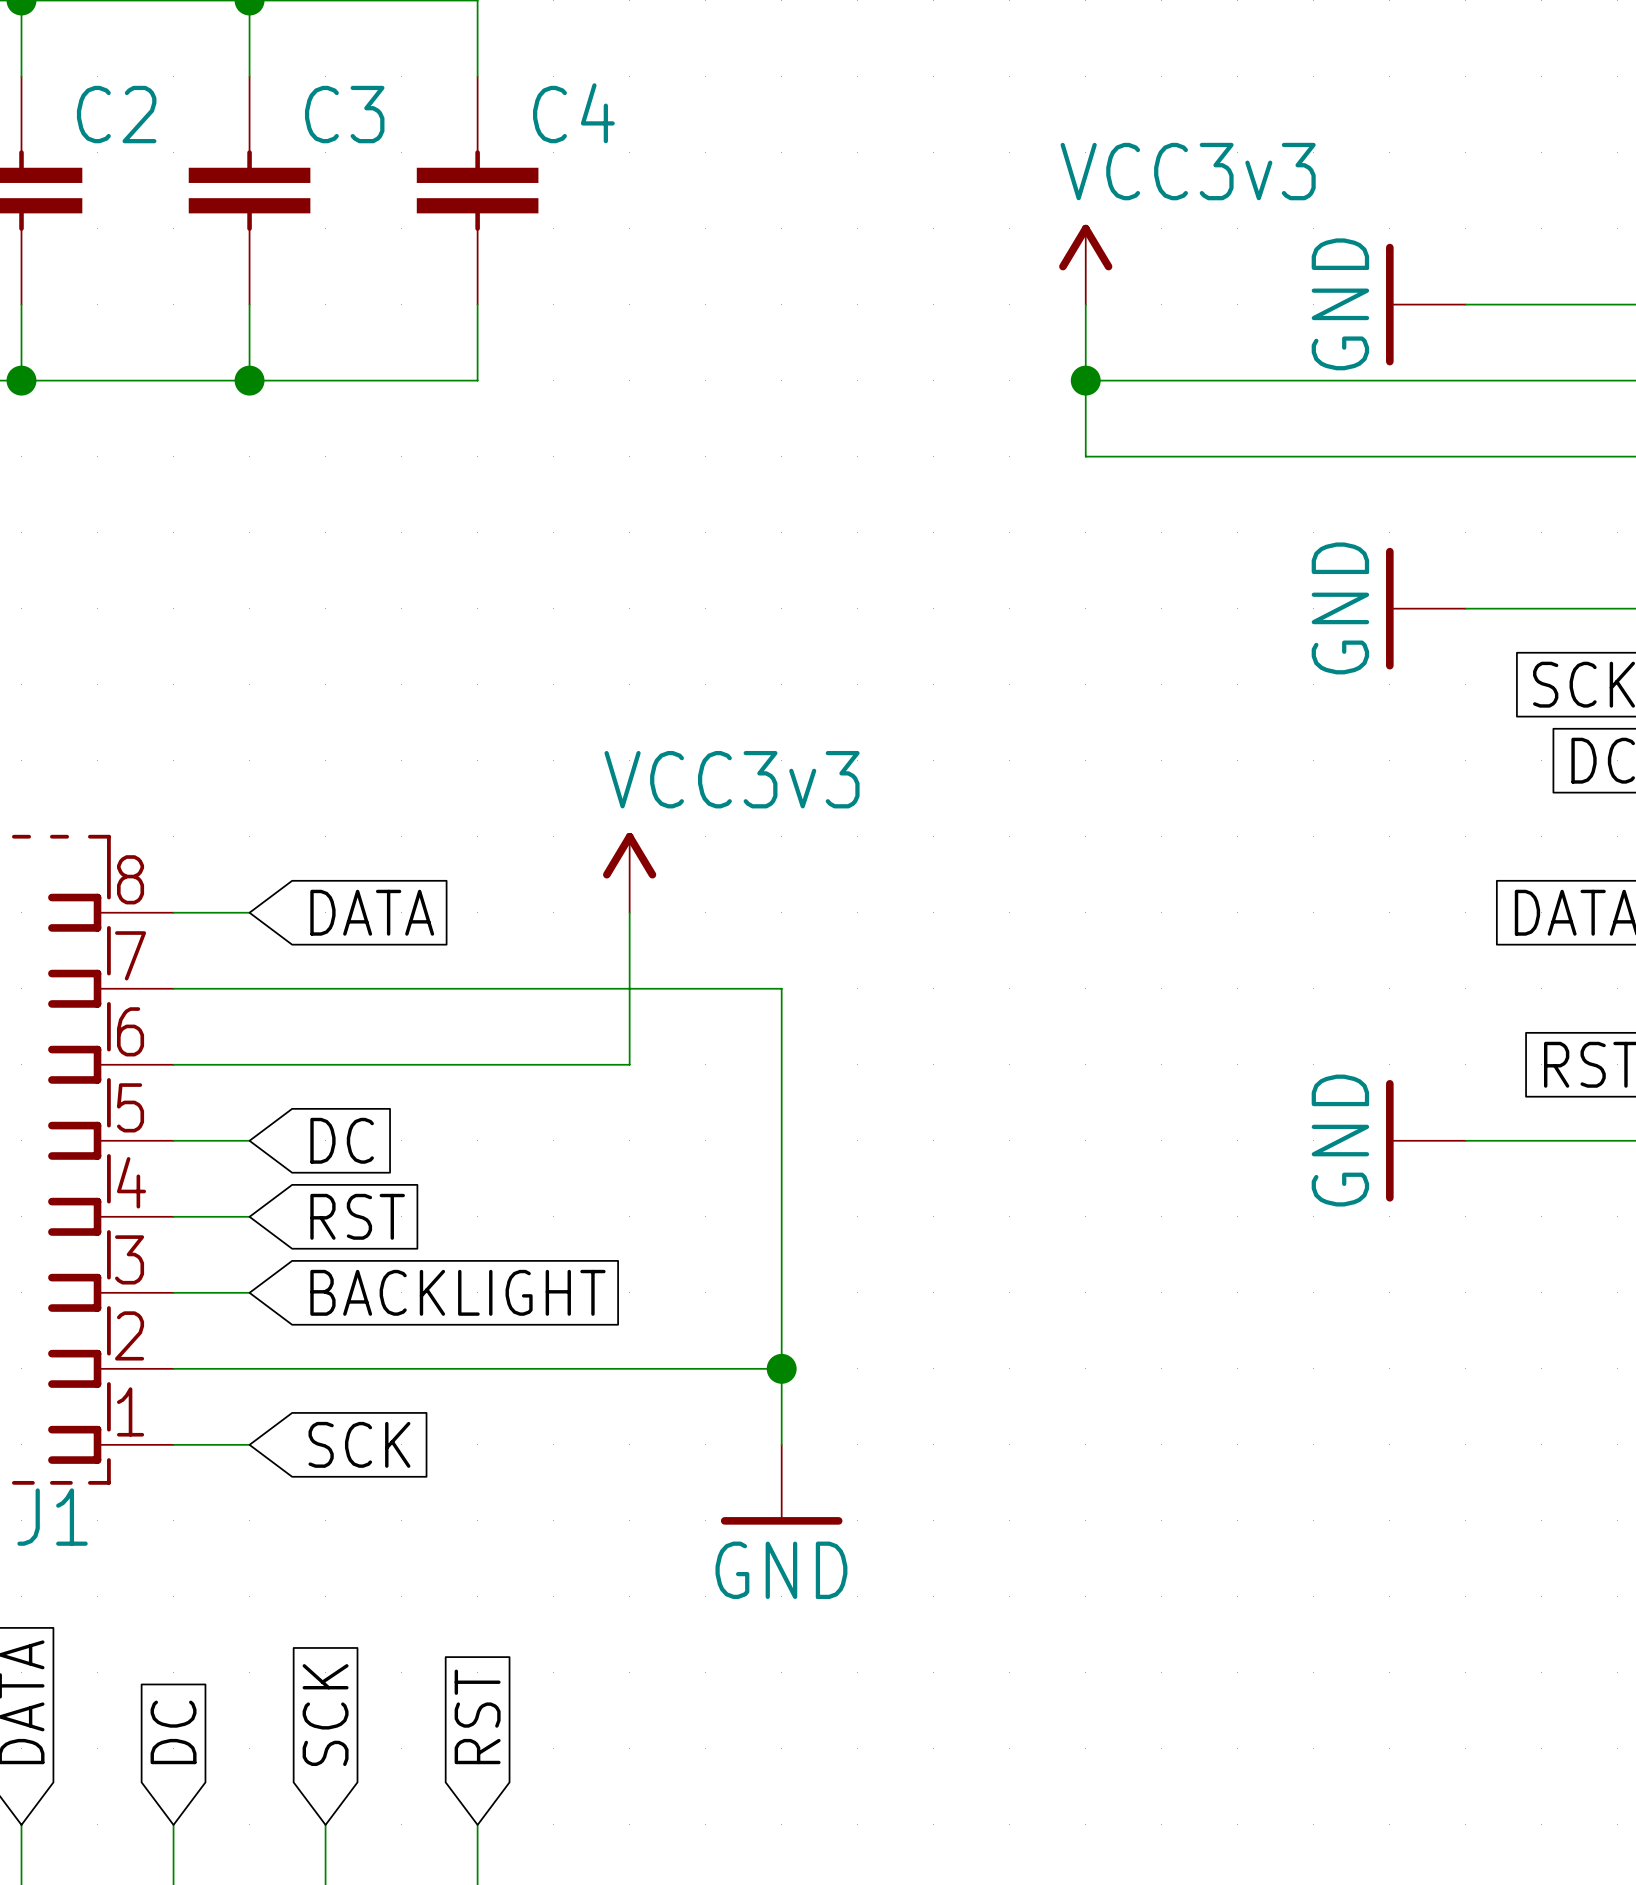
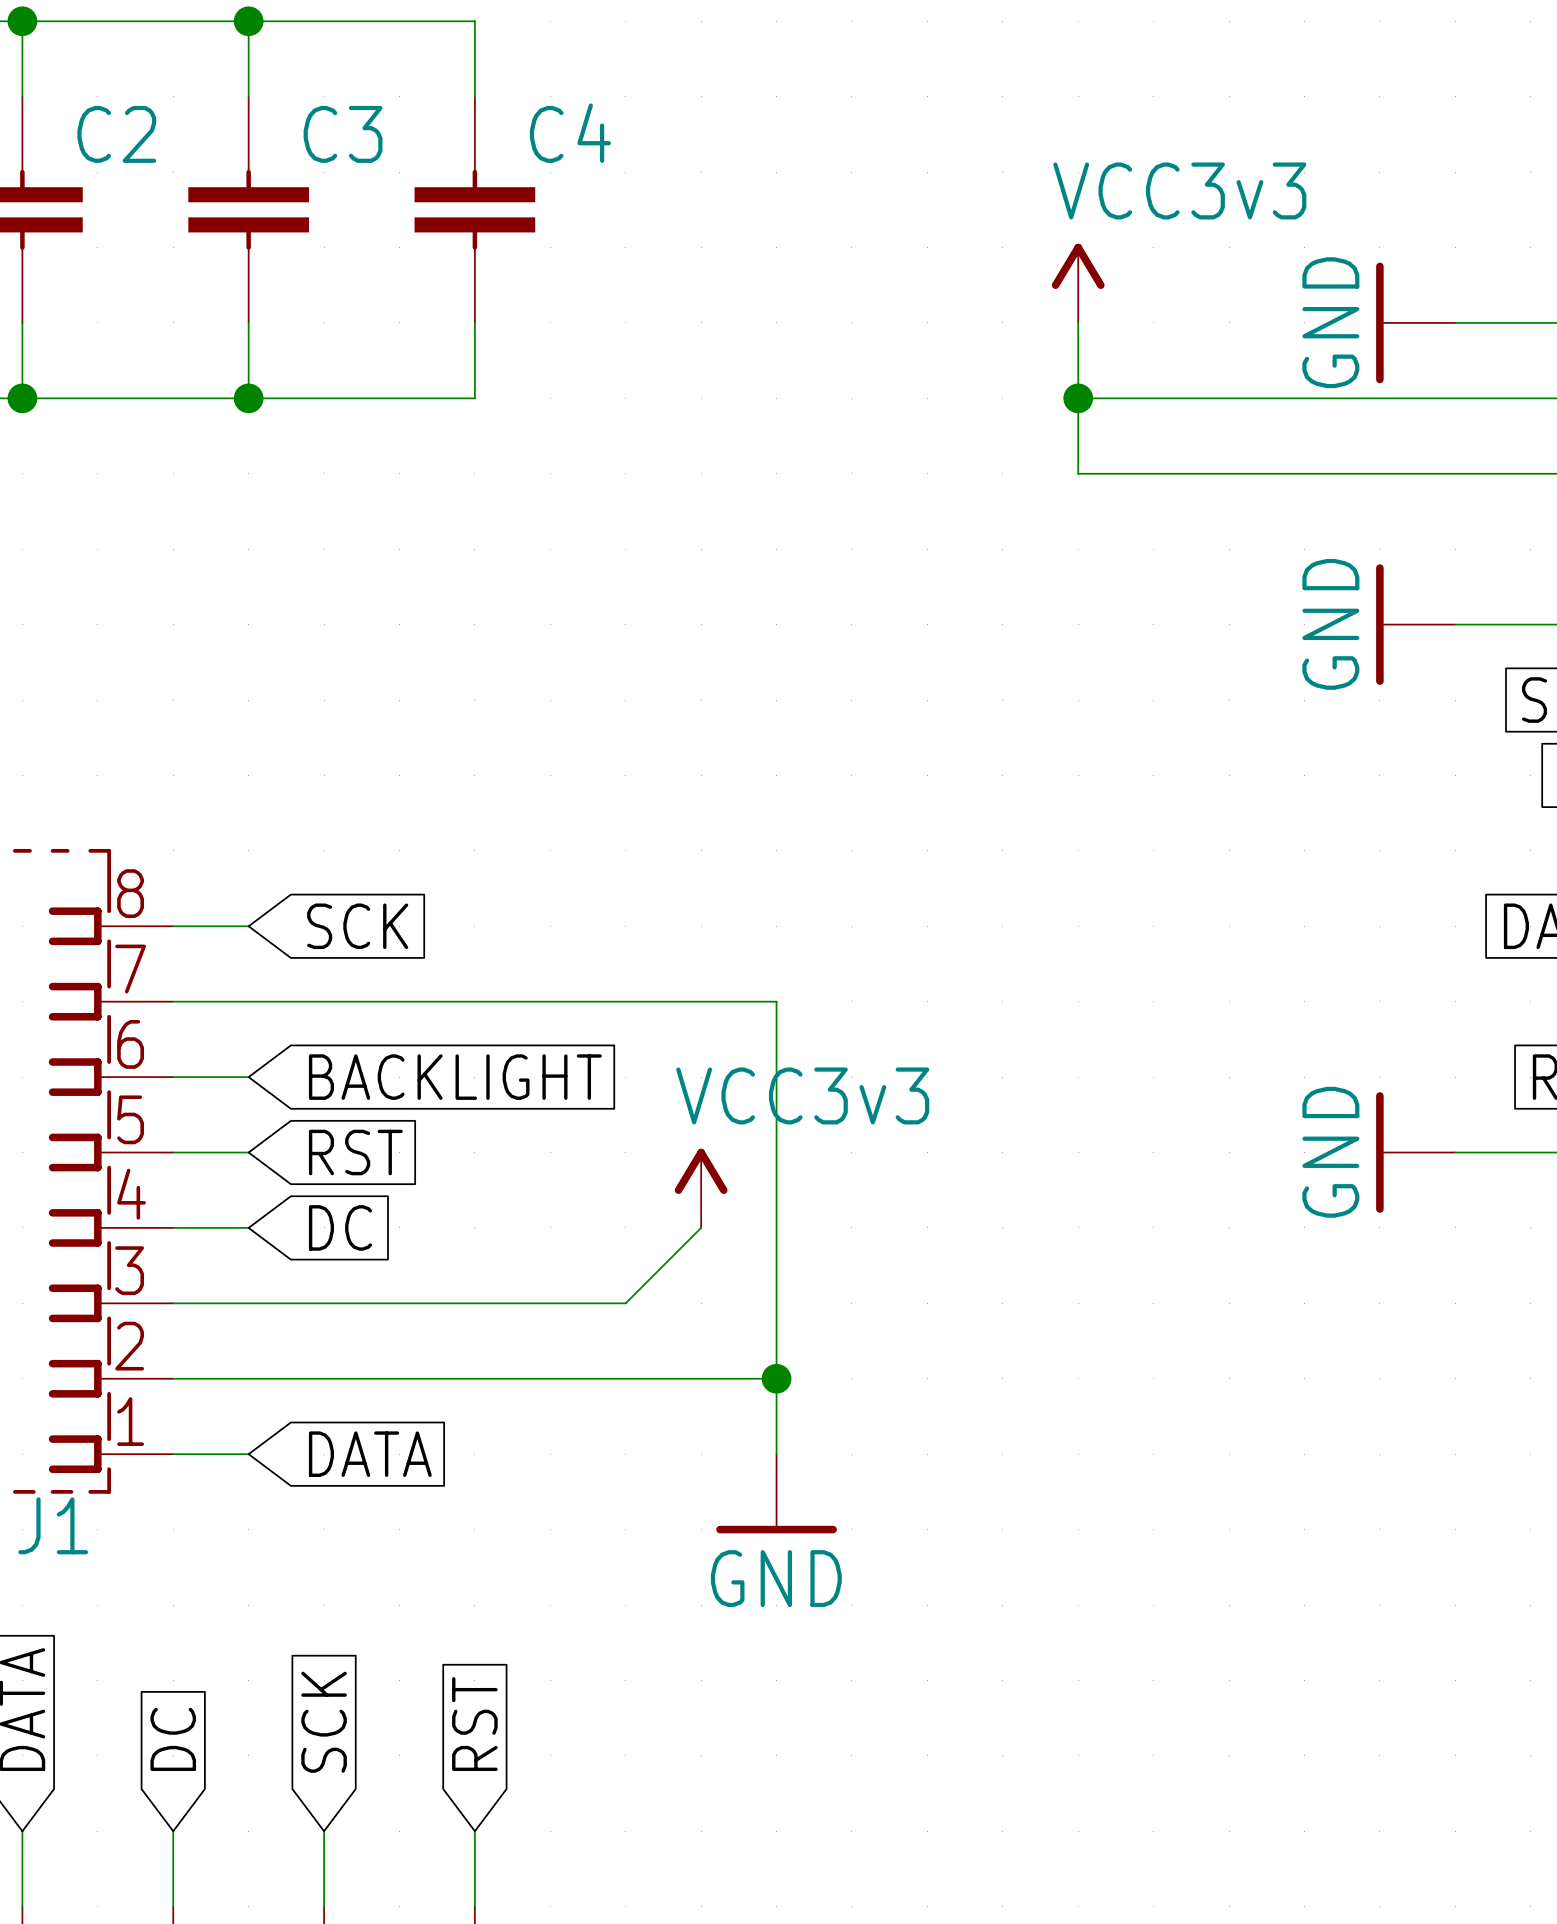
power symbol position: VCC3v3 (629, 872) -> VCC3v3 (701, 1188)
global label: DATA (372, 912) -> SCK (357, 926)
wire: (629, 912) (629, 1064) (249, 1064) -> none
global label: DC (342, 1140) -> RST (355, 1152)
global label: RST (357, 1216) -> DC (340, 1227)
wire: none -> (701, 1227) (625, 1303) (248, 1303)
global label position: BACKLIGHT (457, 1292) -> BACKLIGHT (455, 1077)
global label: SCK (359, 1444) -> DATA (370, 1454)

